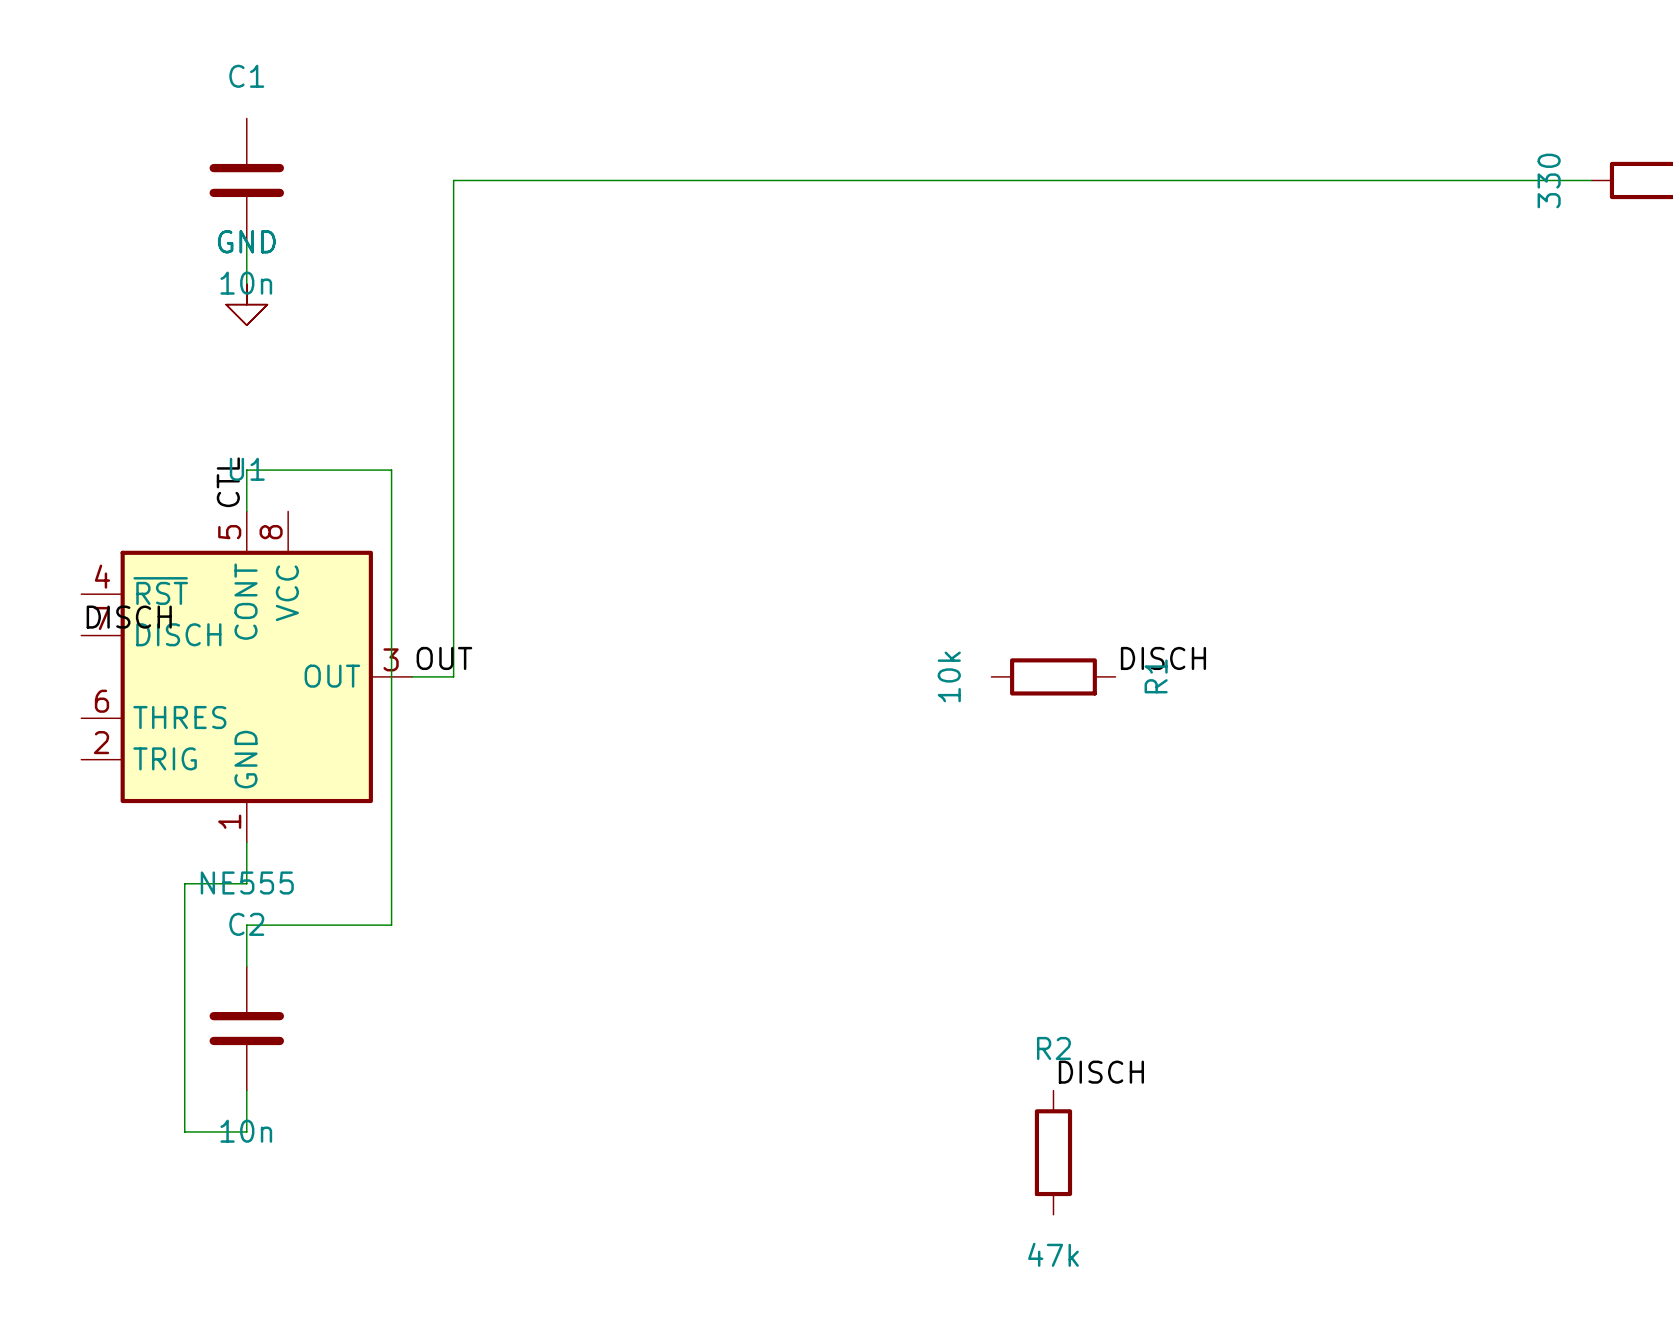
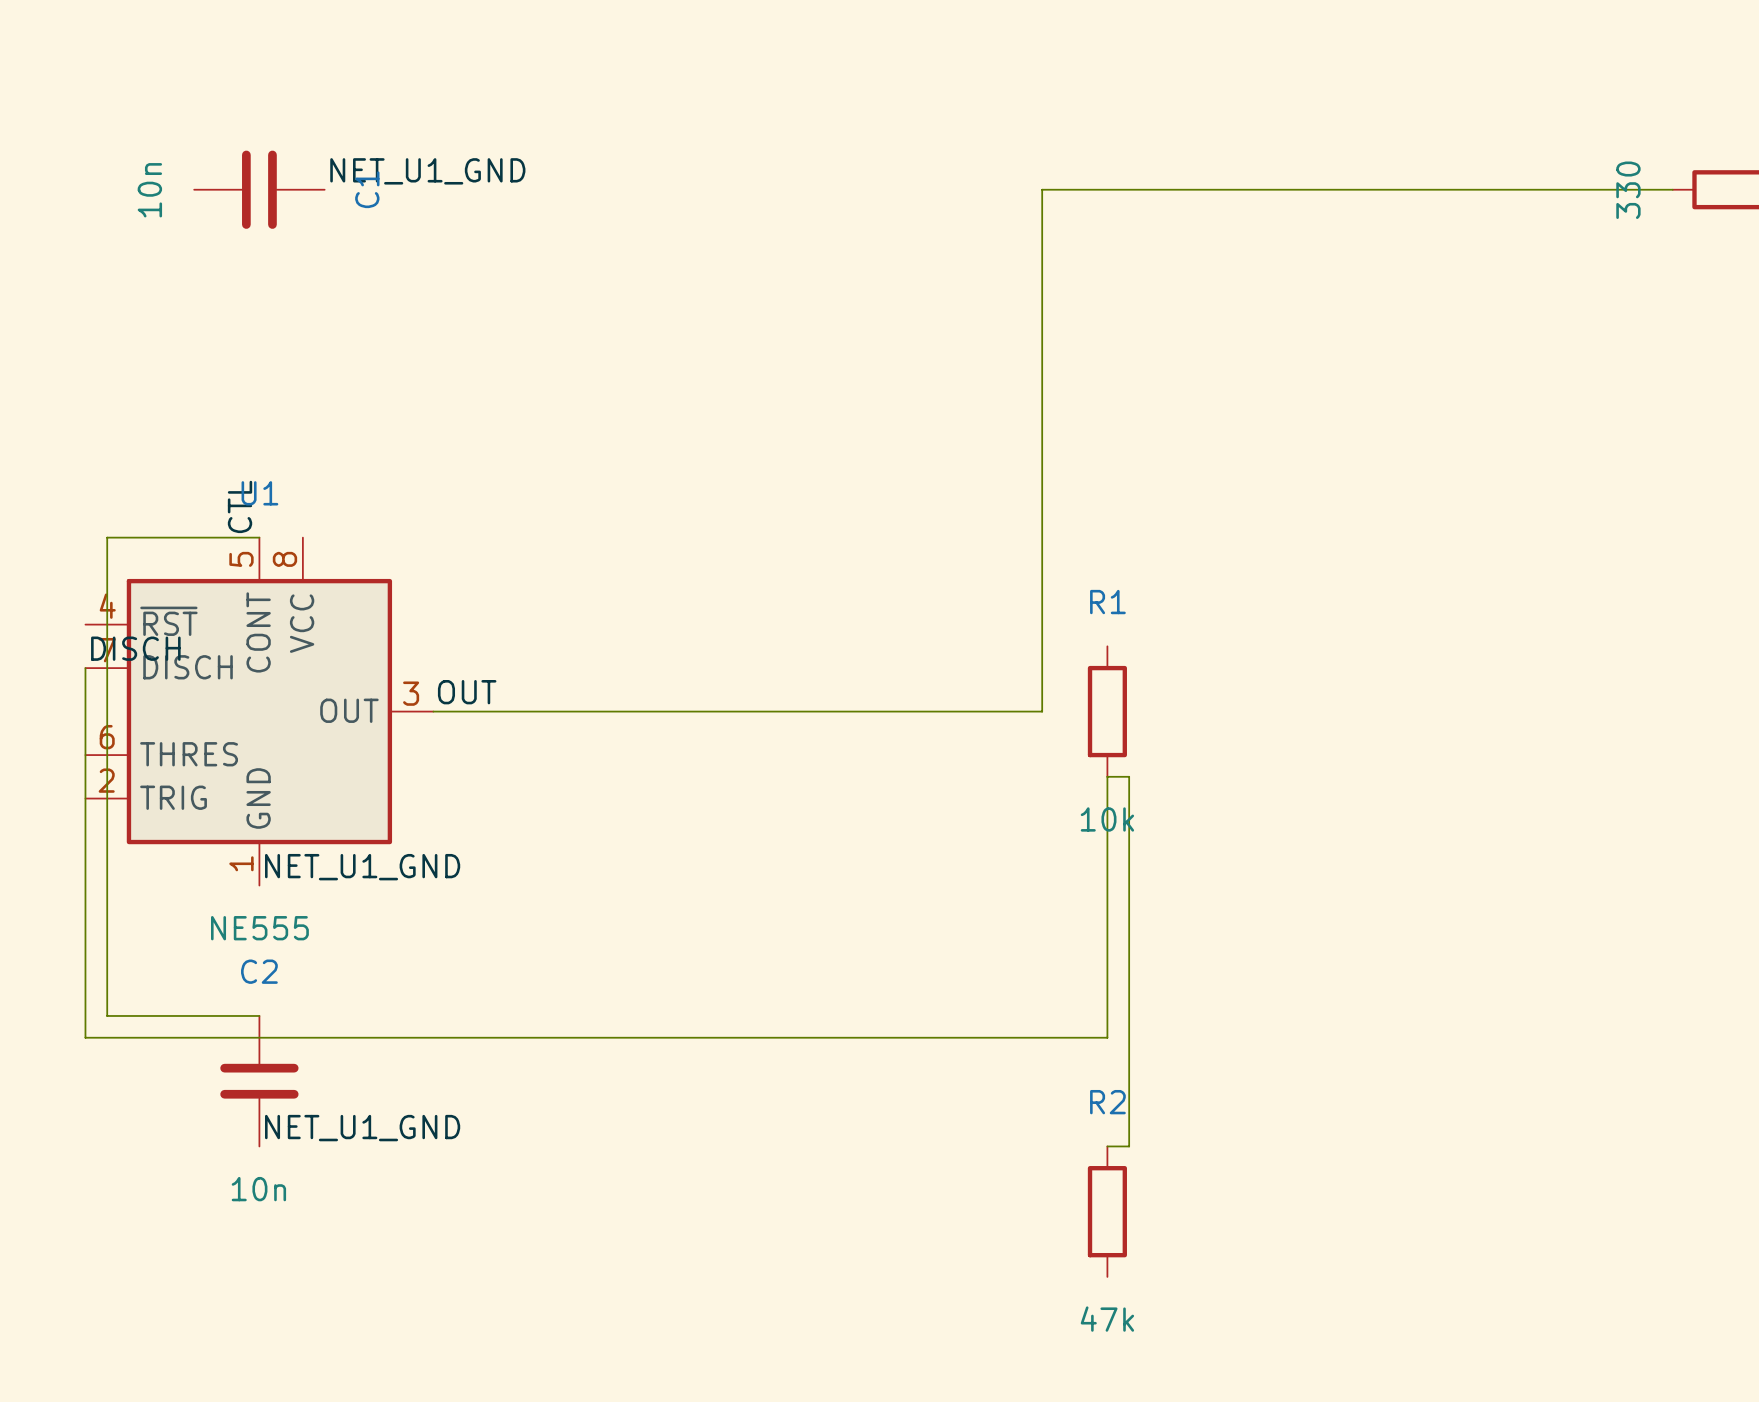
label: none -> NET_U1_GND (427, 171)
C1 rotation: 0° (246, 180) -> 90° clockwise (259, 189)
wire: (991, 180) (453, 180) (453, 676) -> (1042, 189) (1042, 711) (476, 711)
wire: (246, 242) (246, 283) -> none
power symbol: GND (246, 304) -> none
wire: (246, 511) (246, 470) (391, 470) (391, 925) (246, 925) (246, 966) -> (259, 537) (107, 537) (107, 1015) (259, 1015)
wire: none -> (85, 668) (85, 1037) (1107, 1037) (1107, 776) (1129, 776) (1129, 1146) (1107, 1146)
label: DISCH (1163, 658) -> none
R1 value position: 10k (949, 676) -> 10k (1107, 819)
R1 rotation: 0° (1053, 676) -> 90° clockwise (1107, 711)
R1 name position: R1 (1156, 676) -> R1 (1107, 602)
label: none -> NET_U1_GND (362, 867)
wire: (246, 842) (246, 883) (184, 883) (184, 1131) (246, 1131) (246, 1090) -> none
label: DISCH (1101, 1072) -> none
label: none -> NET_U1_GND (362, 1128)

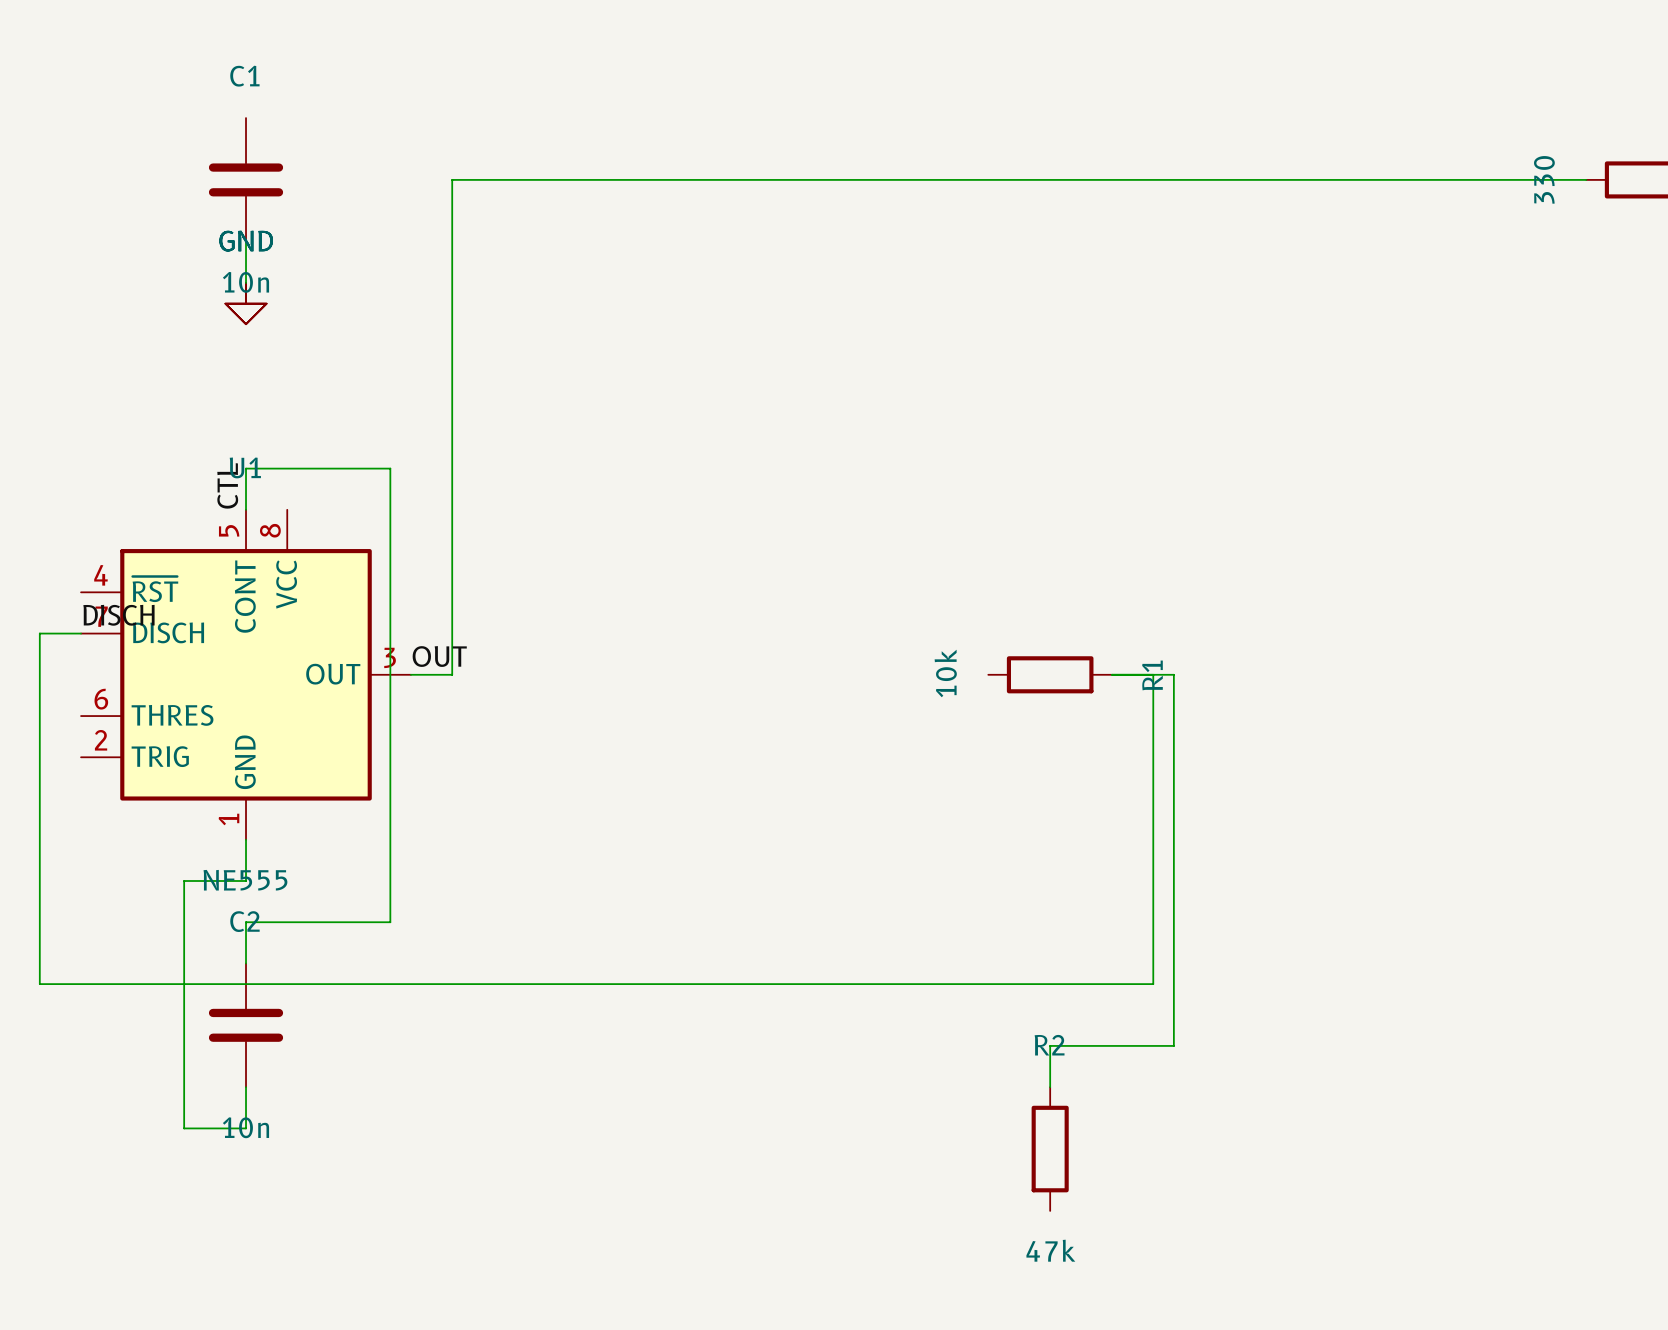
label: NET_U1_GND (427, 171) -> none
C1 rotation: 0° (259, 189) -> 90° clockwise (246, 179)
C1 name position: C1 (367, 189) -> C1 (244, 76)
wire: (1042, 189) (1042, 711) (476, 711) -> (988, 179) (452, 179) (452, 674)
C1 value position: 10n (149, 190) -> 10n (245, 282)
wire: none -> (246, 241) (246, 283)
power symbol: none -> GND (246, 303)
wire: (259, 537) (107, 537) (107, 1015) (259, 1015) -> (246, 509) (246, 468) (390, 468) (390, 922) (246, 922) (246, 963)
wire: (85, 668) (85, 1037) -> (81, 633) (39, 633) (39, 984) (81, 984)
R1 rotation: 0° (1107, 711) -> 90° clockwise (1050, 674)
wire: none -> (1153, 674) (1153, 984) (1050, 984)
label: NET_U1_GND (362, 867) -> none
wire: none -> (246, 839) (246, 880) (184, 880) (184, 1128) (246, 1128) (246, 1087)
wire: (1107, 1037) (1107, 776) (1129, 776) (1129, 1146) (1107, 1146) -> (1112, 674) (1173, 674) (1173, 1045) (1050, 1045) (1050, 1087)
label: NET_U1_GND (362, 1128) -> none

